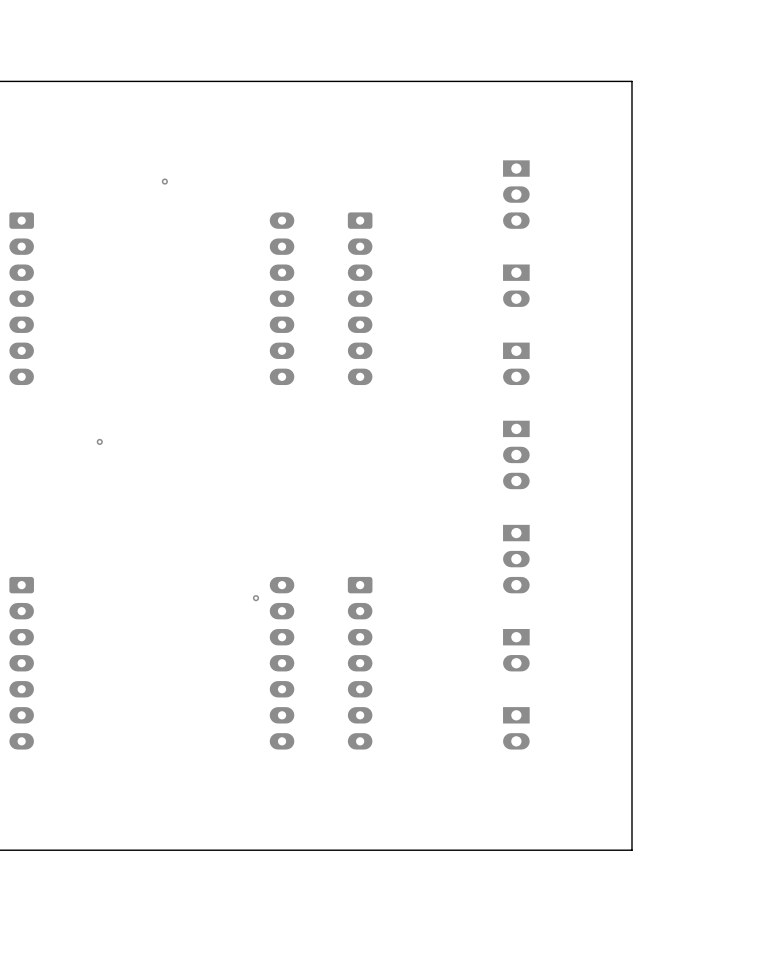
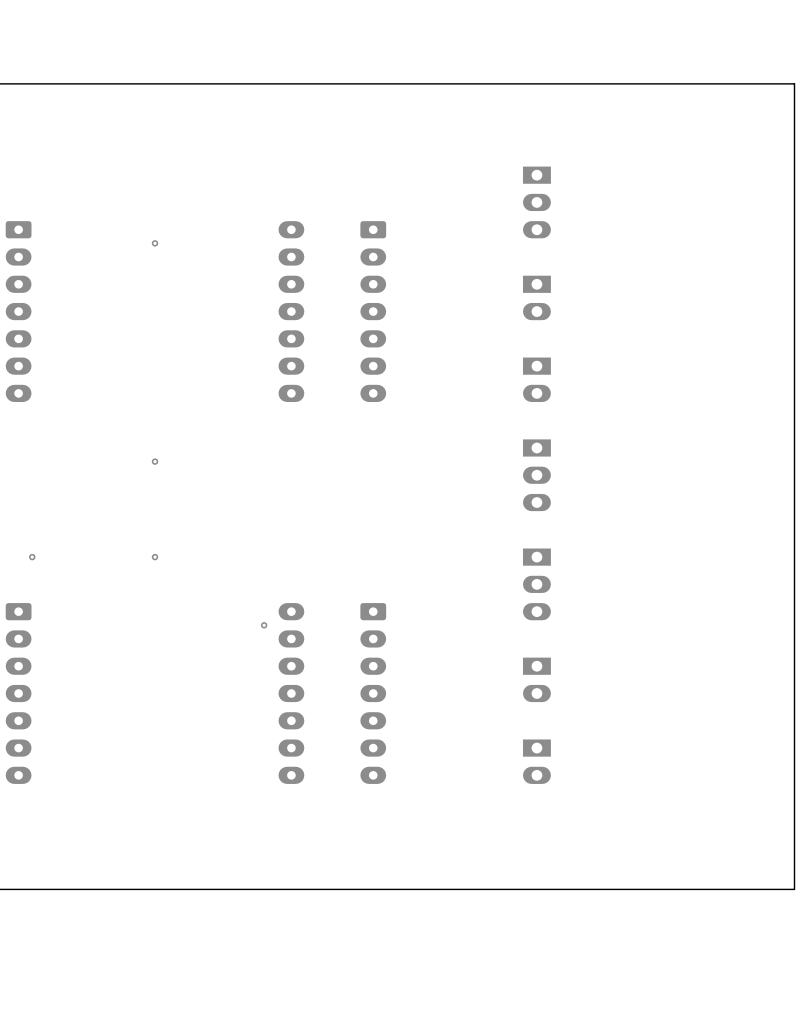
board edge: (631, 81) (631, 850) -> (658, 83) (794, 83) (794, 889) (658, 889)
via position: (164, 181) -> (155, 243)
via position: (99, 441) -> (155, 461)
via: none -> (32, 557)
via: none -> (155, 557)

